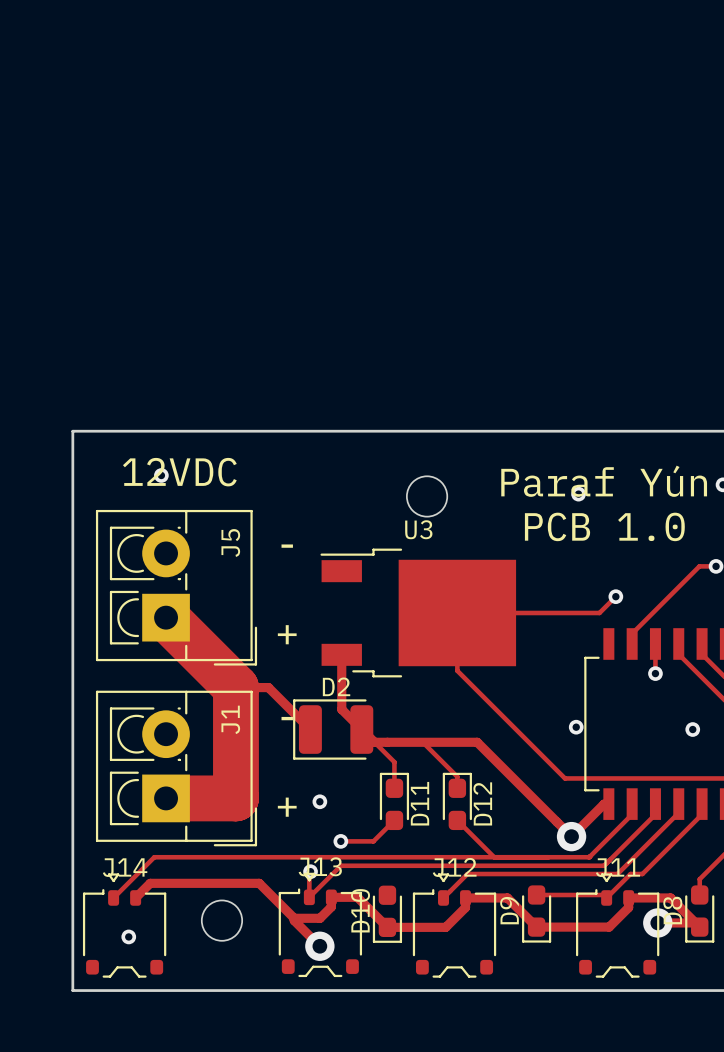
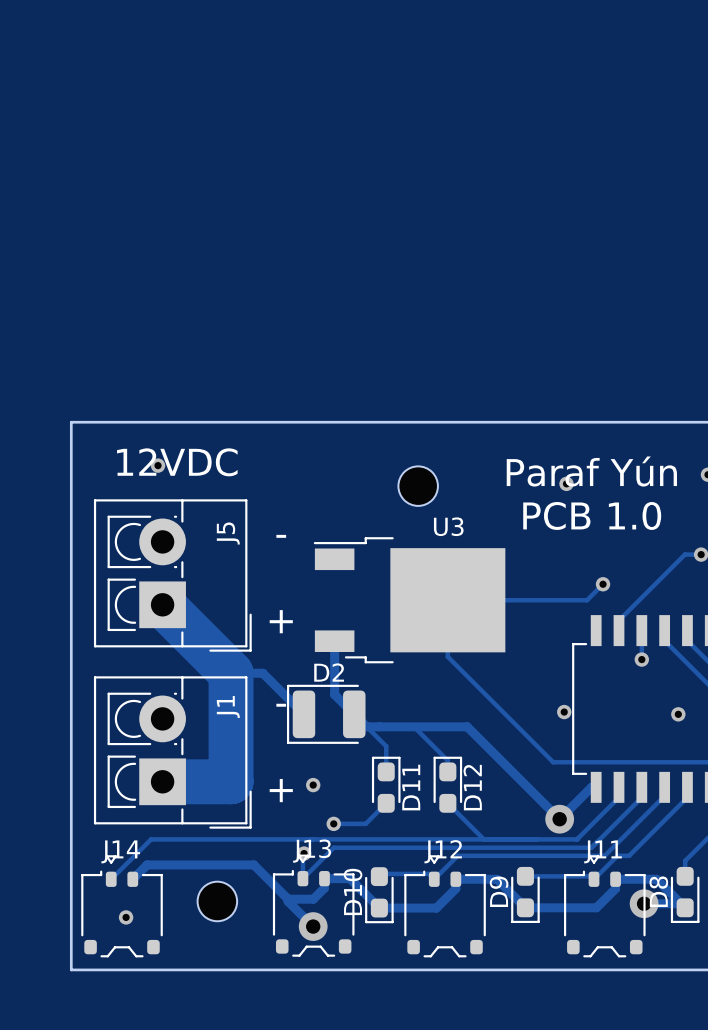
U3 name position: U3 (418, 529) -> U3 (448, 526)
track: none -> (379, 873) (428, 873) (434, 879)

